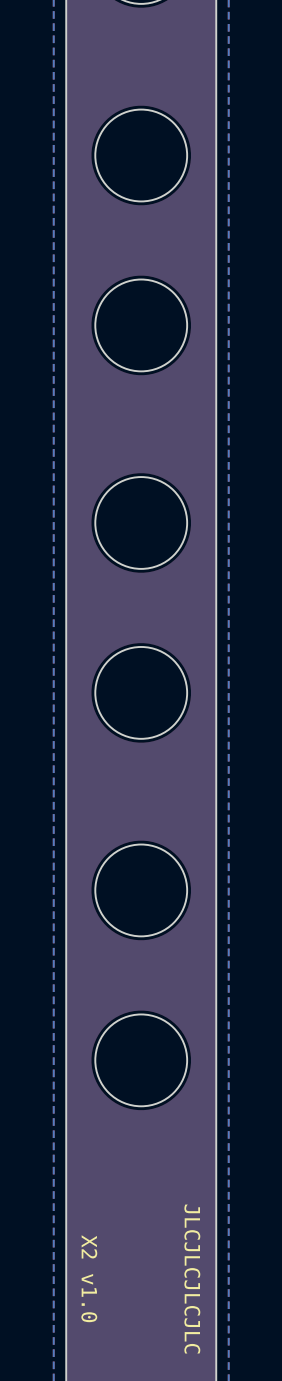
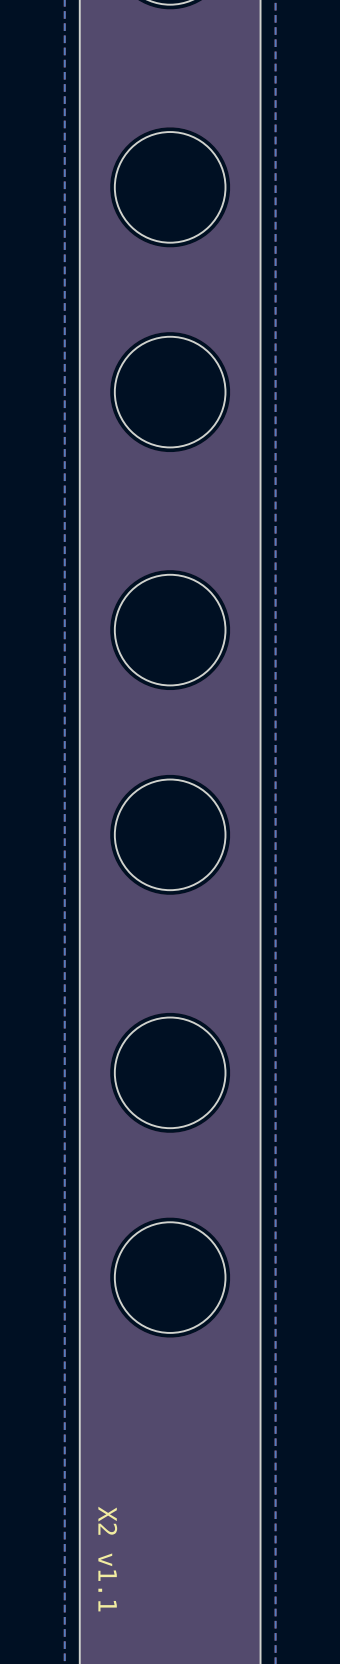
text: X2 v1.0 (89, 1278) -> X2 v1.1 (107, 1559)
text: JLCJLCJLCJLC (192, 1279) -> none

